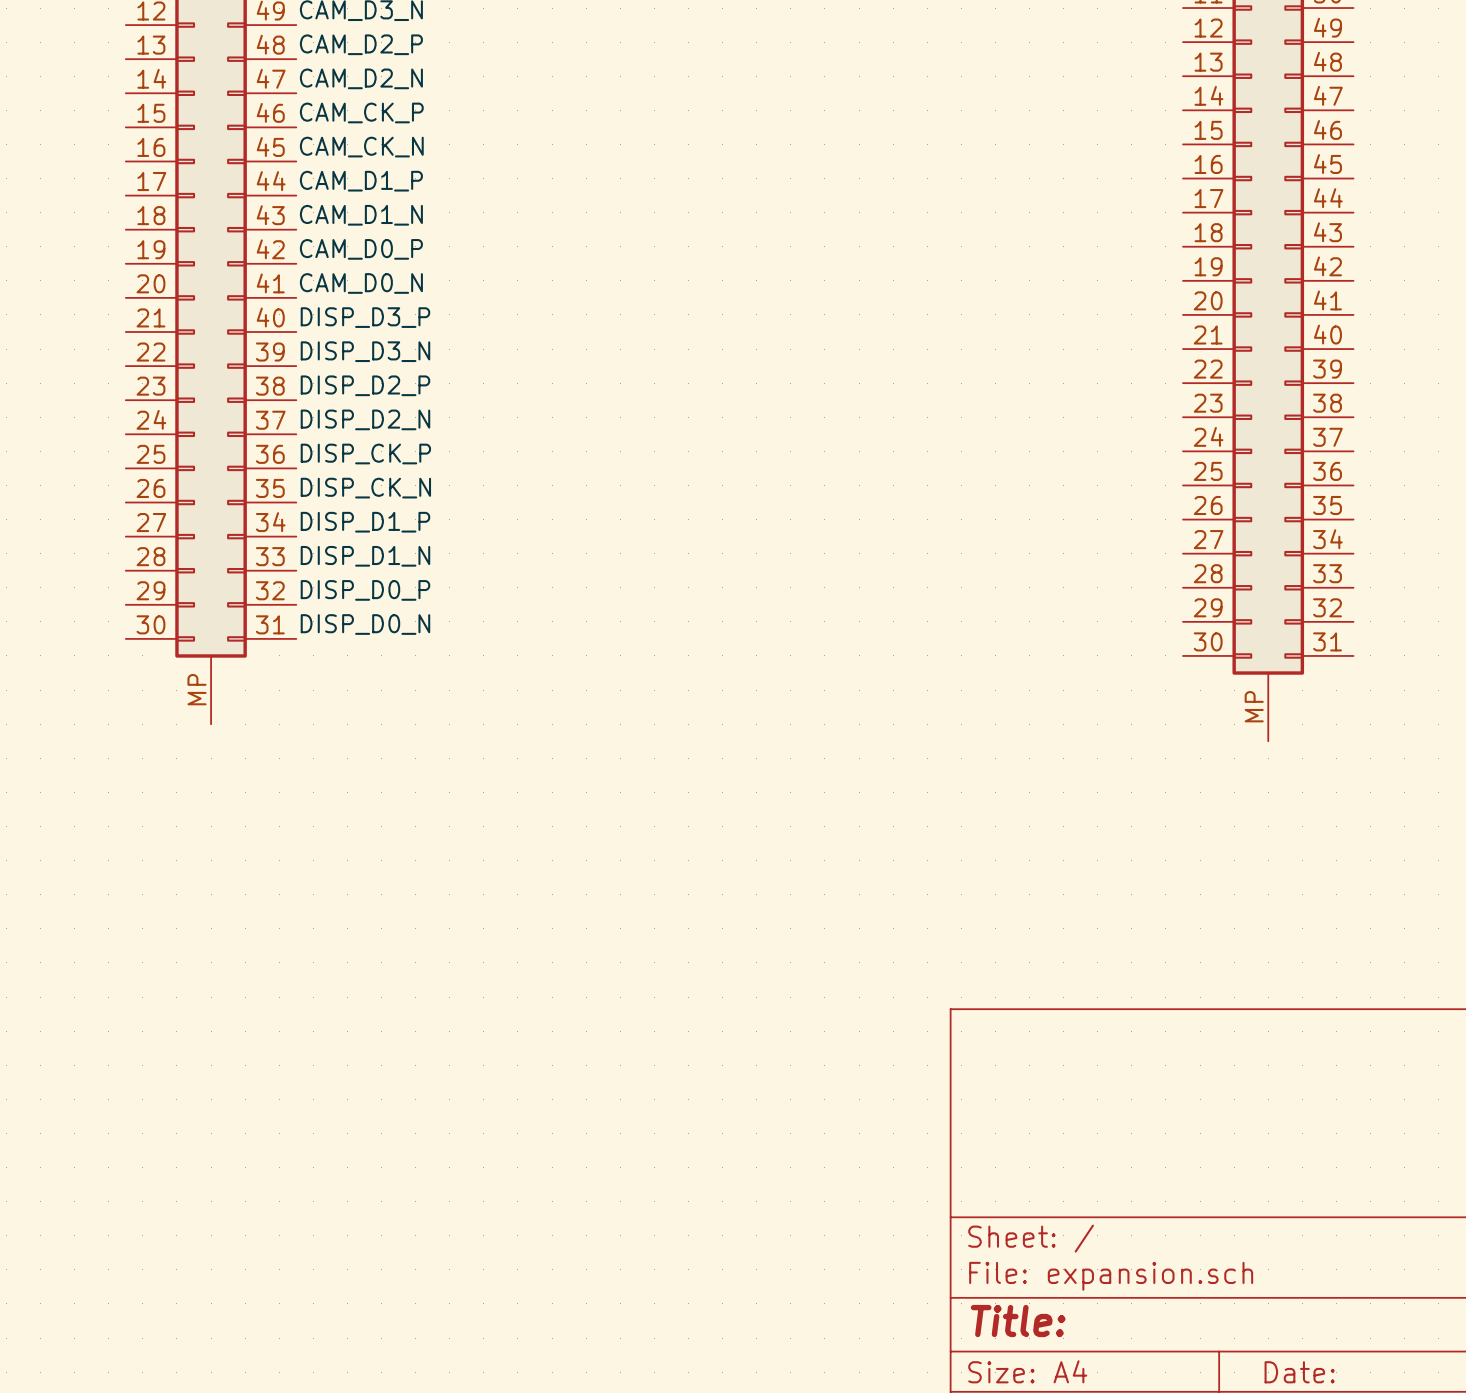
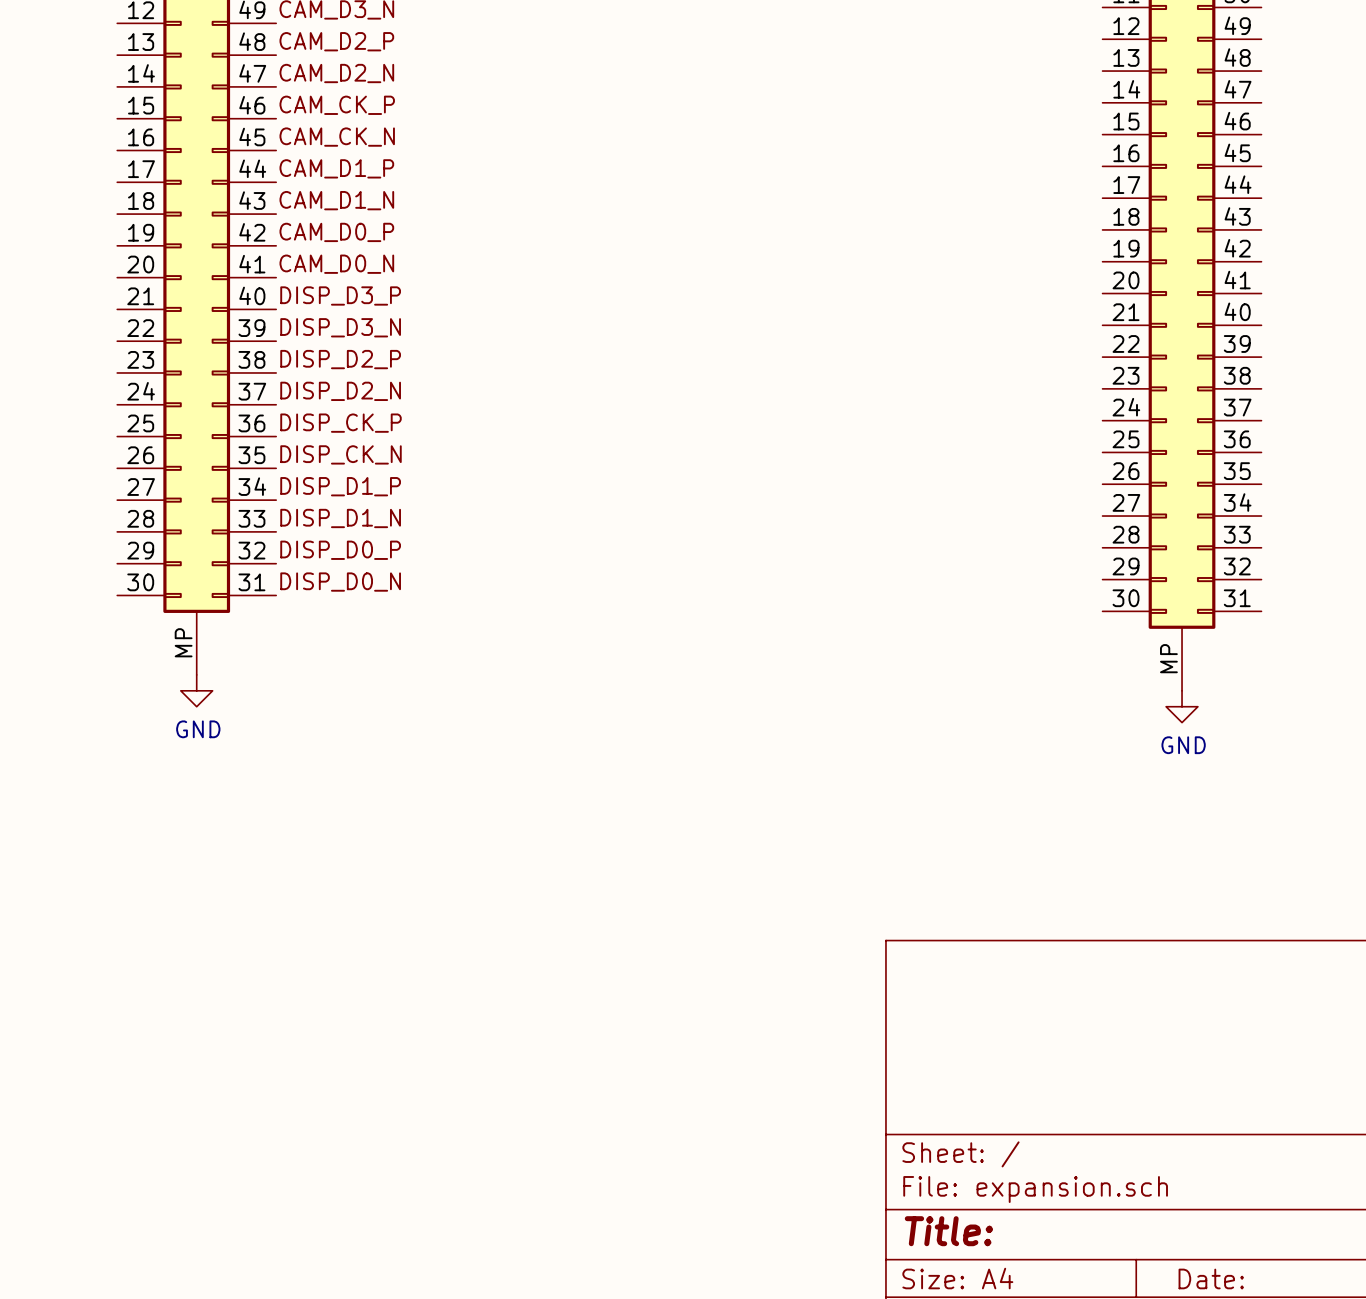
power symbol: none -> GND (196, 690)
power symbol: none -> GND (1182, 706)

